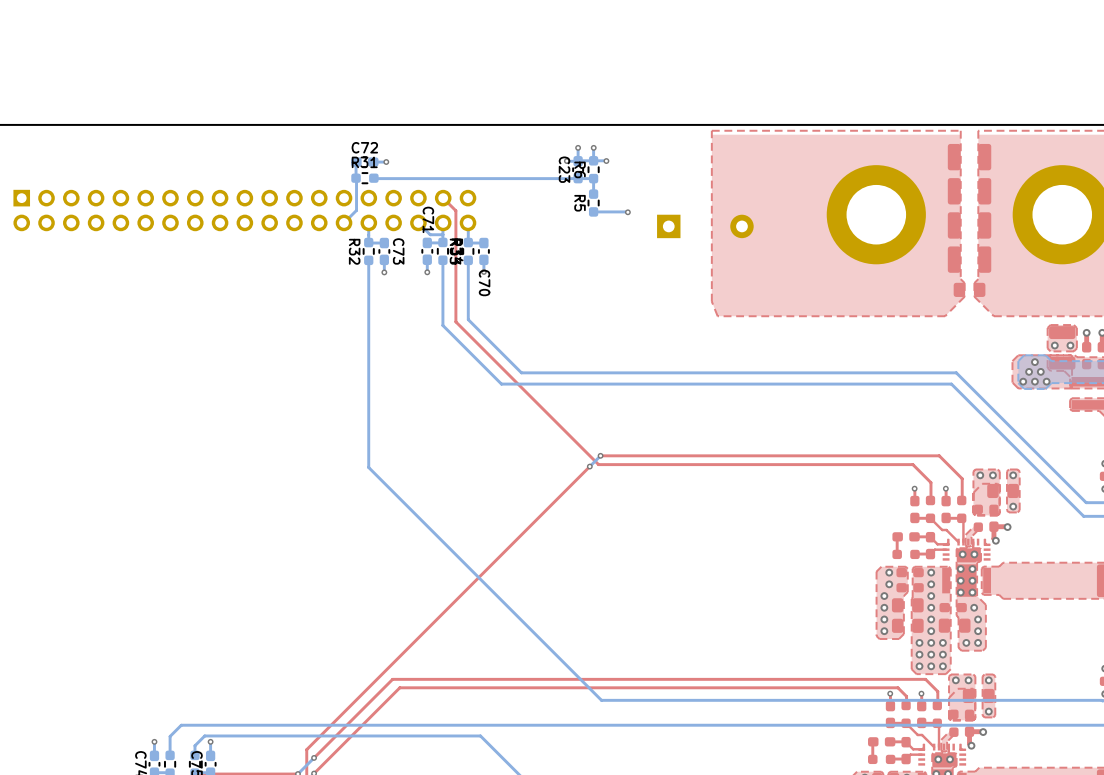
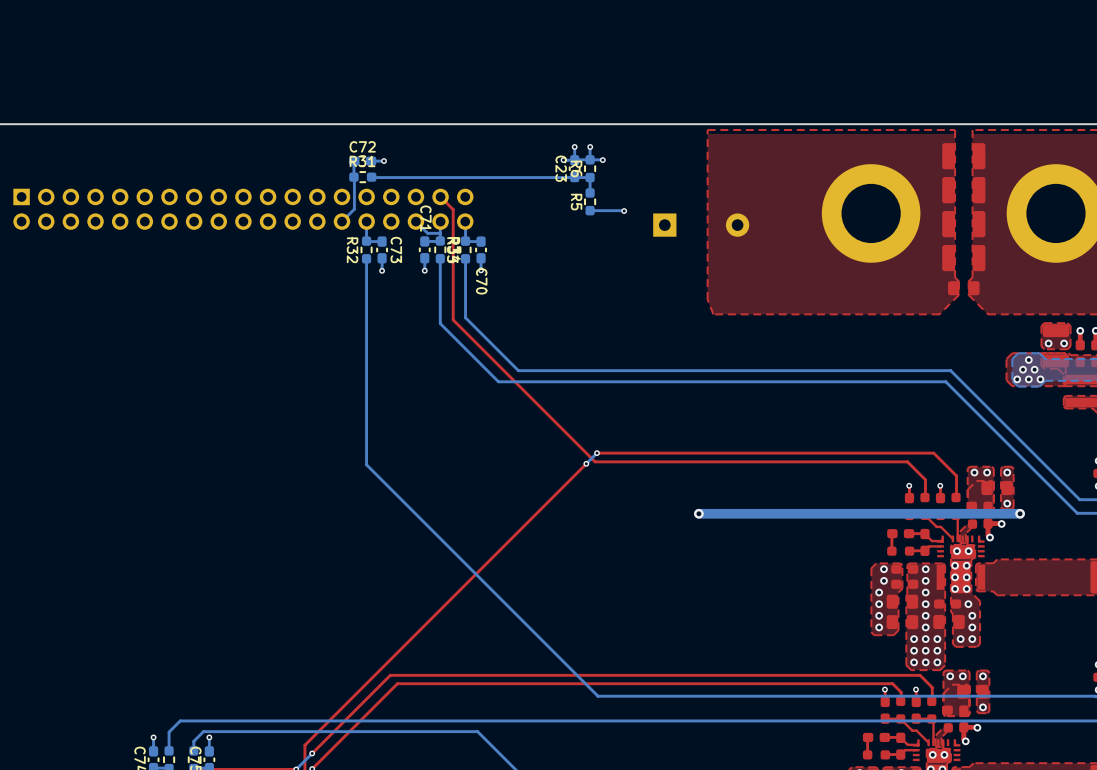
via: none -> (698, 513)
bottom track: none -> (1020, 513) (698, 513)
via: none -> (1020, 513)

